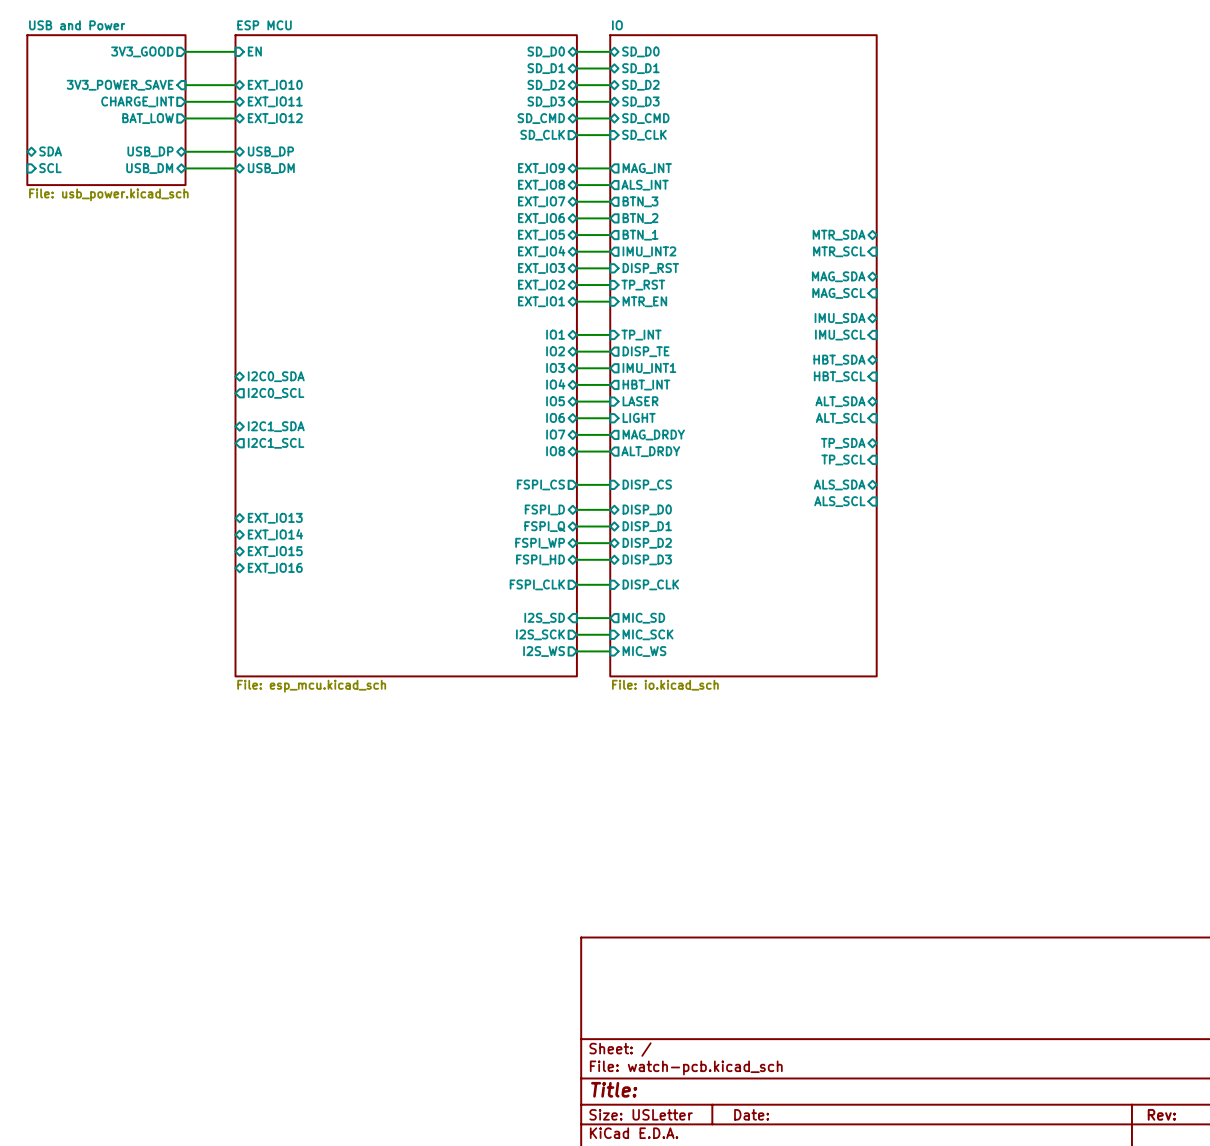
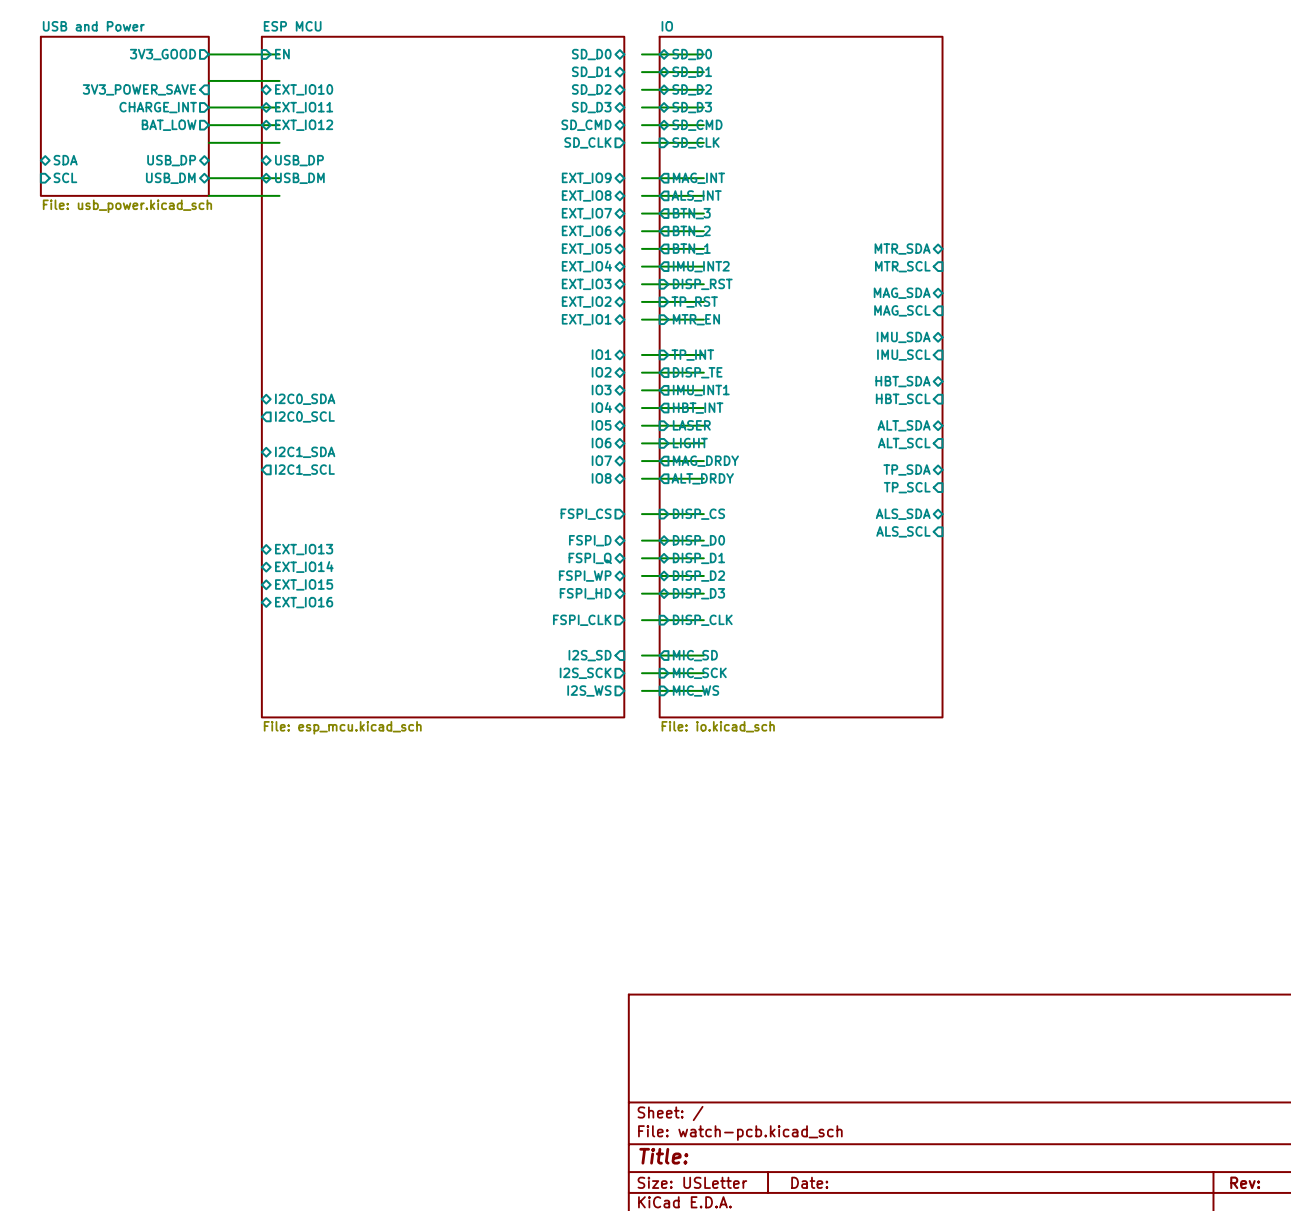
wire: none -> (261, 54) (279, 54)
wire: (576, 51) (593, 51) -> none
wire: none -> (659, 54) (703, 54)
wire: (576, 68) (593, 68) -> none
wire: none -> (659, 72) (703, 72)
wire: none -> (208, 80) (279, 80)
wire: (185, 85) (235, 85) -> none
wire: (576, 85) (593, 85) -> none
wire: none -> (659, 89) (703, 89)
wire: none -> (261, 107) (279, 107)
wire: (576, 101) (593, 101) -> none
wire: none -> (659, 107) (703, 107)
wire: none -> (261, 125) (279, 125)
wire: (576, 118) (593, 118) -> none
wire: none -> (659, 125) (703, 125)
wire: none -> (208, 142) (279, 142)
wire: (576, 135) (593, 135) -> none
wire: none -> (659, 142) (703, 142)
wire: (185, 151) (235, 151) -> none
wire: none -> (261, 178) (279, 178)
wire: (576, 168) (593, 168) -> none
wire: none -> (659, 178) (703, 178)
wire: none -> (208, 195) (279, 195)
wire: (576, 185) (593, 185) -> none
wire: none -> (659, 195) (703, 195)
wire: (576, 201) (593, 201) -> none
wire: none -> (659, 213) (703, 213)
wire: (576, 218) (593, 218) -> none
wire: none -> (659, 231) (703, 231)
wire: (576, 235) (593, 235) -> none
wire: none -> (659, 248) (703, 248)
wire: (576, 251) (593, 251) -> none
wire: none -> (659, 266) (703, 266)
wire: (576, 268) (593, 268) -> none
wire: none -> (659, 284) (703, 284)
wire: (576, 285) (593, 285) -> none
wire: none -> (659, 301) (703, 301)
wire: (576, 301) (593, 301) -> none
wire: none -> (659, 319) (703, 319)
wire: (576, 334) (593, 334) -> none
wire: none -> (659, 354) (703, 354)
wire: (576, 351) (593, 351) -> none
wire: none -> (659, 372) (703, 372)
wire: (576, 368) (593, 368) -> none
wire: none -> (659, 390) (703, 390)
wire: (576, 384) (593, 384) -> none
wire: none -> (659, 408) (703, 408)
wire: (576, 401) (593, 401) -> none
wire: none -> (659, 425) (703, 425)
wire: (576, 418) (593, 418) -> none
wire: none -> (659, 443) (703, 443)
wire: (576, 434) (593, 434) -> none
wire: none -> (659, 461) (703, 461)
wire: (576, 451) (593, 451) -> none
wire: none -> (659, 478) (703, 478)
wire: (576, 484) (593, 484) -> none
wire: none -> (659, 514) (703, 514)
wire: (576, 509) (593, 509) -> none
wire: none -> (659, 540) (703, 540)
wire: (576, 526) (593, 526) -> none
wire: none -> (659, 558) (703, 558)
wire: (576, 543) (593, 543) -> none
wire: none -> (659, 575) (703, 575)
wire: (576, 559) (593, 559) -> none
wire: none -> (659, 593) (703, 593)
wire: (576, 584) (593, 584) -> none
wire: none -> (659, 620) (703, 620)
wire: (576, 618) (593, 618) -> none
wire: none -> (659, 655) (703, 655)
wire: (576, 634) (593, 634) -> none
wire: none -> (659, 673) (703, 673)
wire: (576, 651) (593, 651) -> none
wire: none -> (659, 690) (703, 690)

